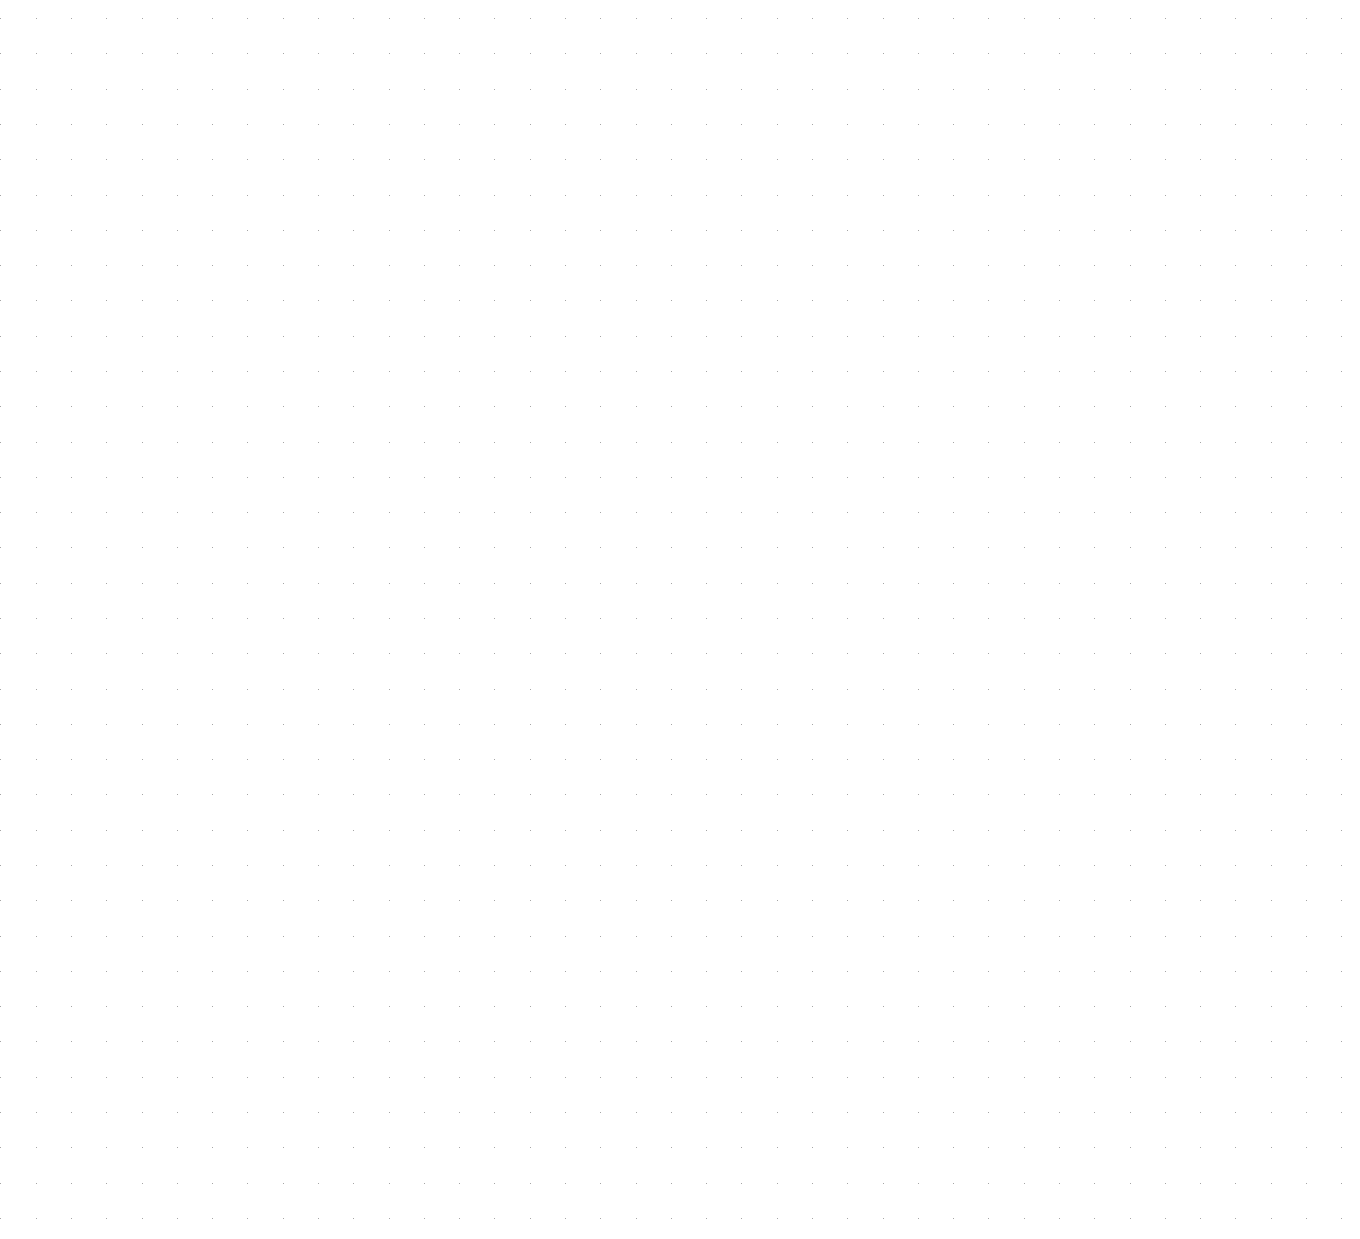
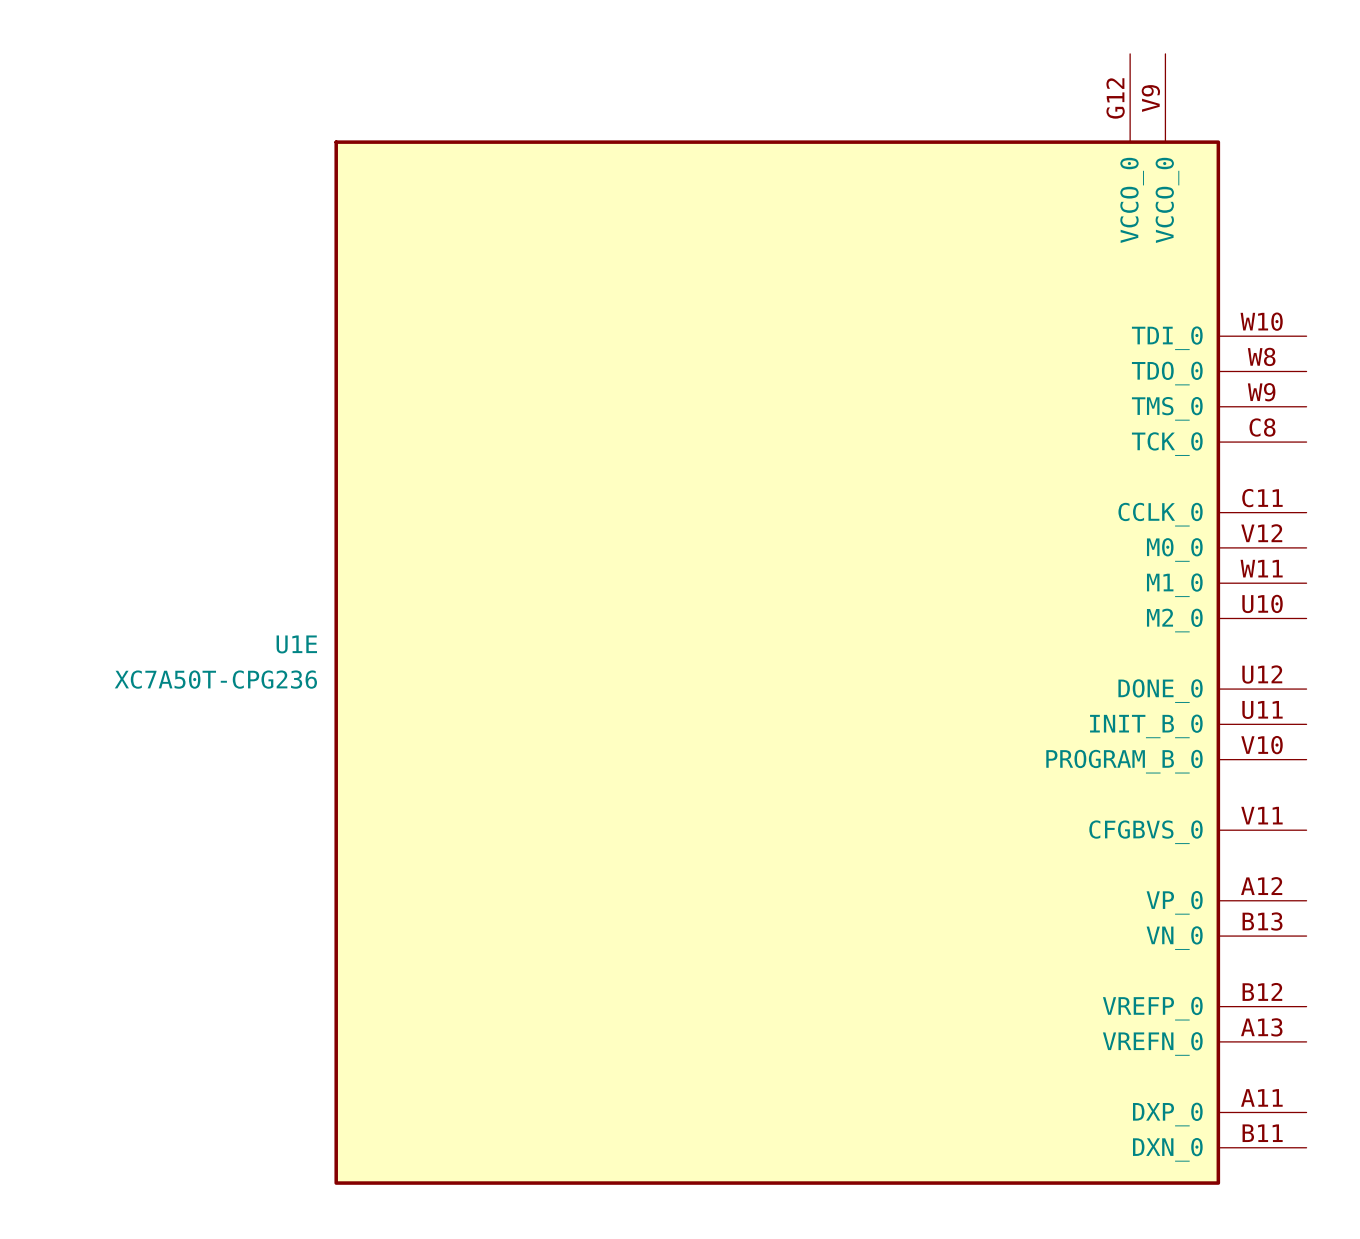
U1E: none -> XC7A50T-CPG236 (820, 619)

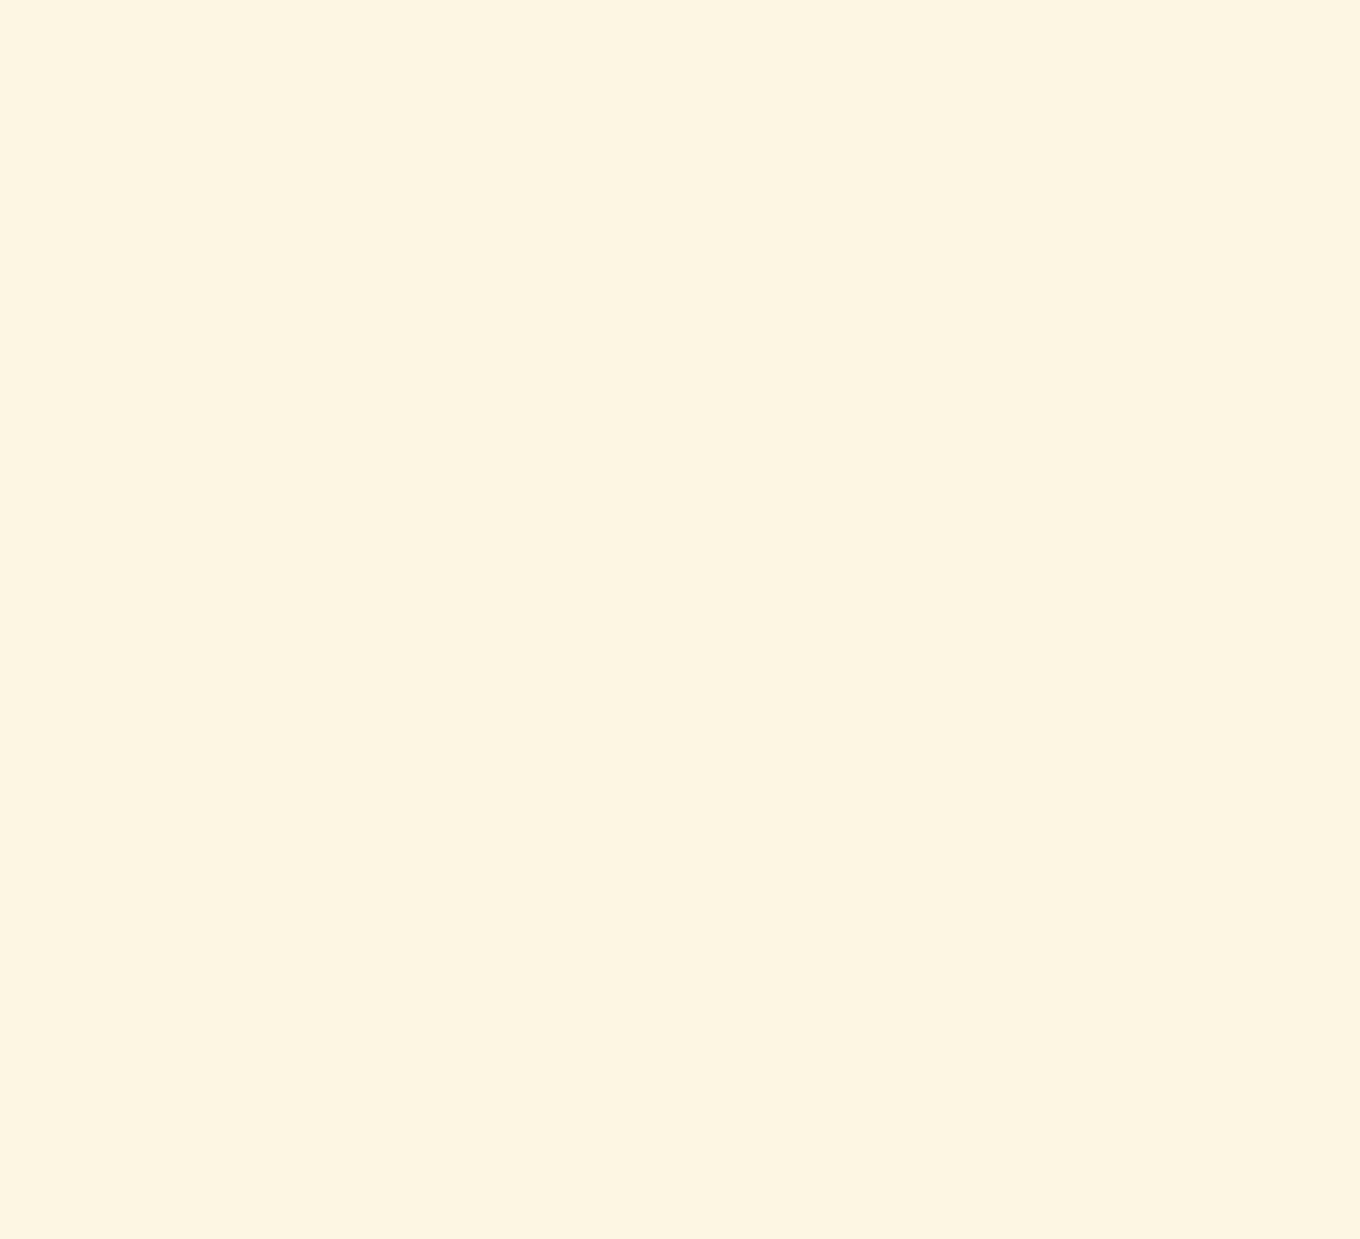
U1E: XC7A50T-CPG236 (820, 619) -> none

